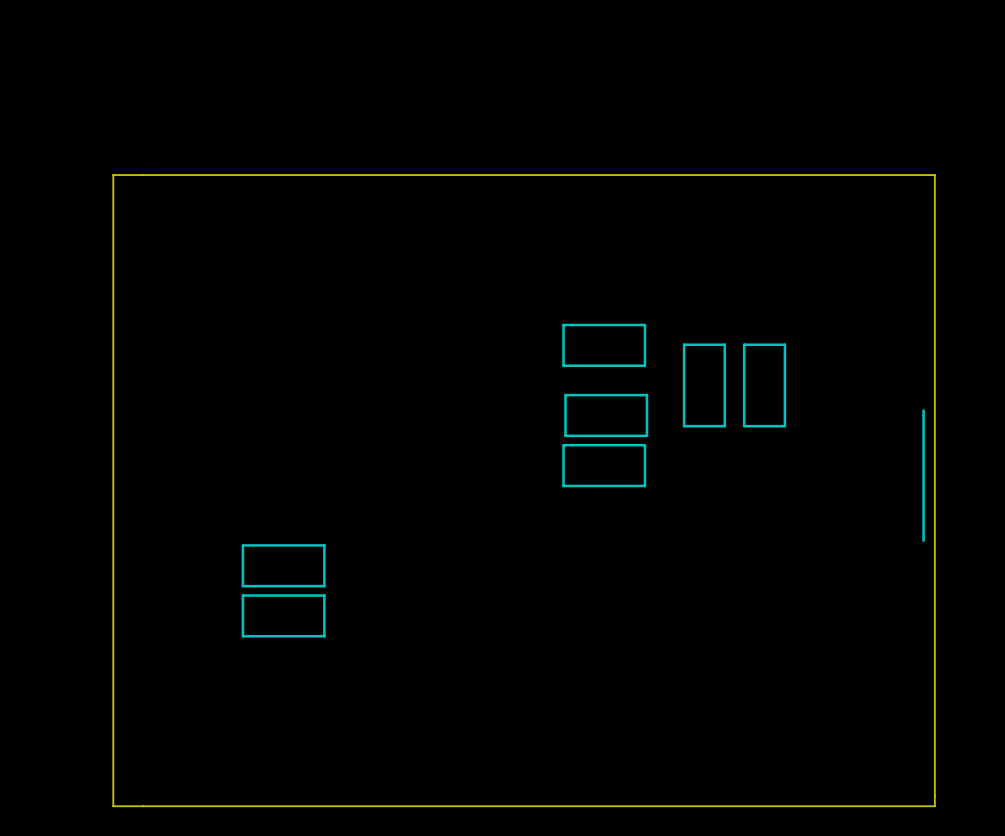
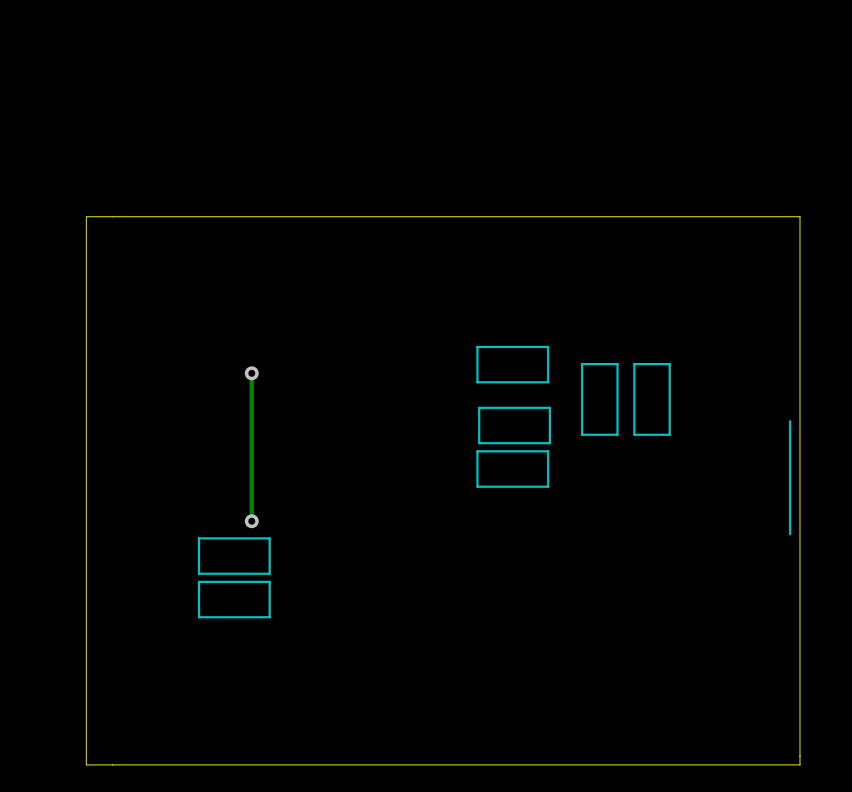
track: none -> (251, 373) (251, 521)
via: none -> (251, 373)
via: none -> (251, 521)

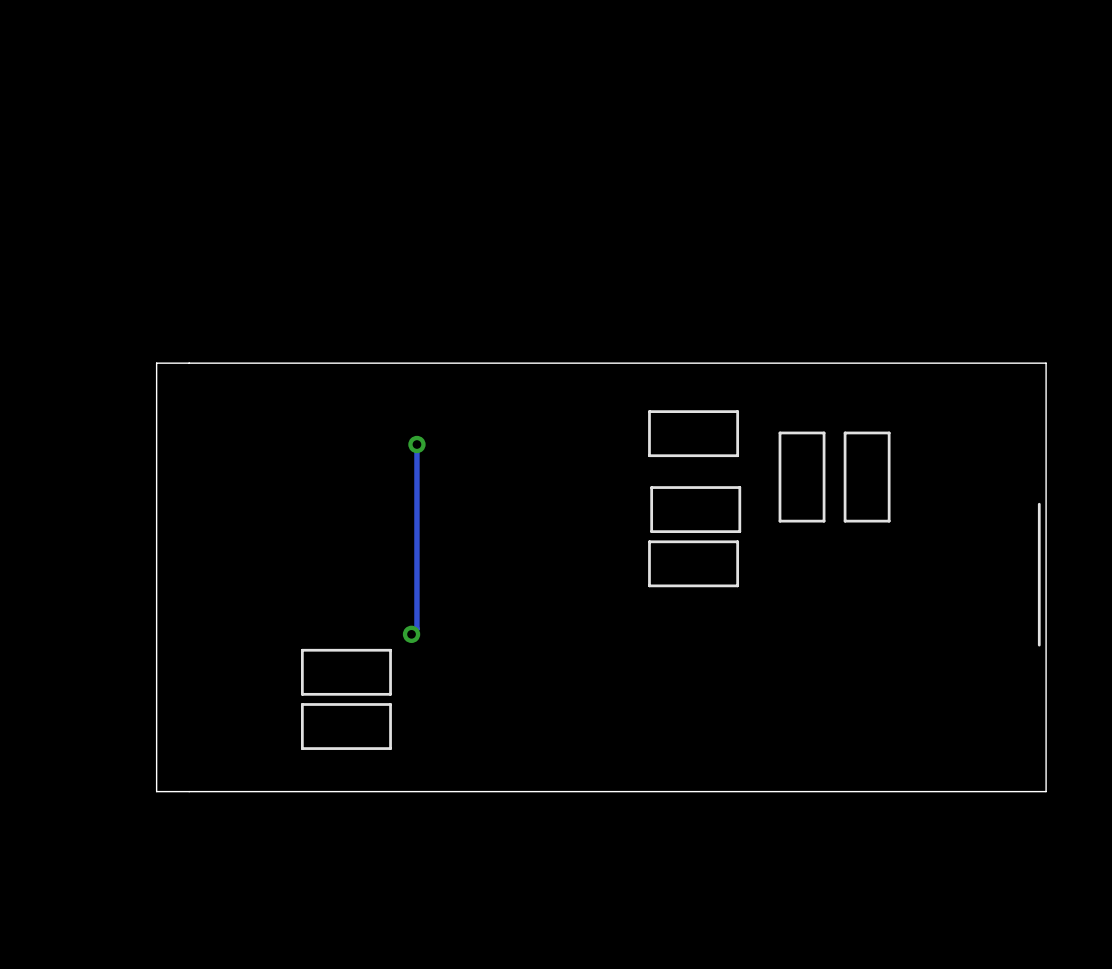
board edge: (799, 216) (86, 216) (86, 764) (799, 764) (799, 216) -> (1046, 363) (1046, 791) (156, 791) (156, 363) (1046, 363)
track: (251, 373) (251, 521) -> none
via position: (251, 373) -> (416, 444)
track: none -> (416, 444) (416, 628) (411, 634)
via position: (251, 521) -> (411, 634)

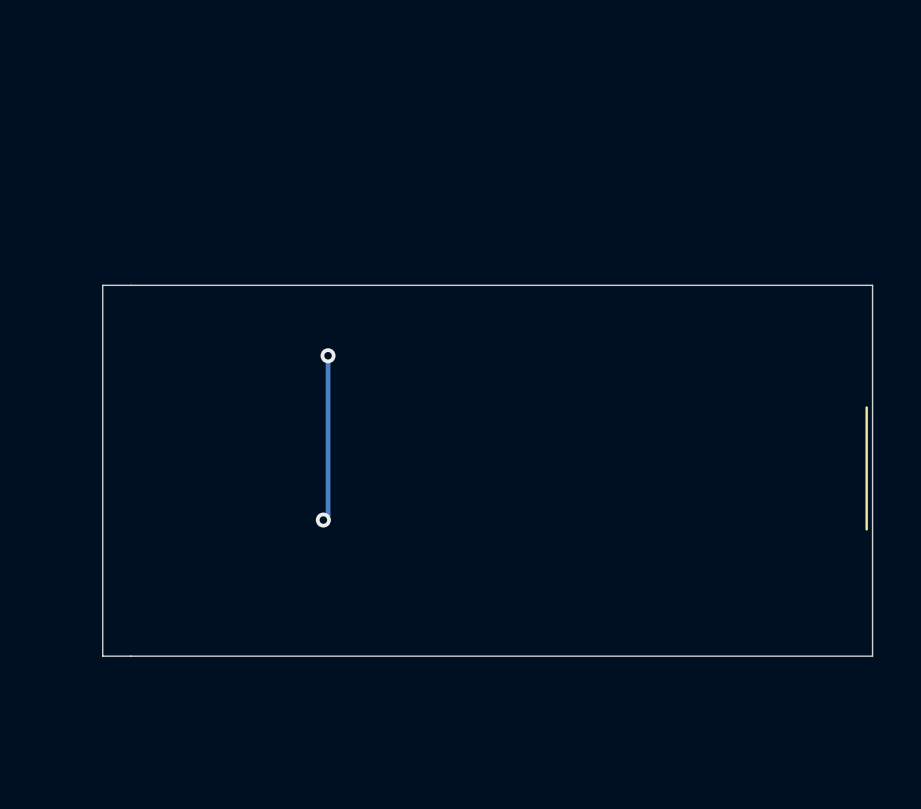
part: (693, 433) -> none
part: (802, 477) -> none
part: (867, 477) -> none
part: (695, 509) -> none
part: (693, 563) -> none
part: (346, 672) -> none
part: (346, 726) -> none

